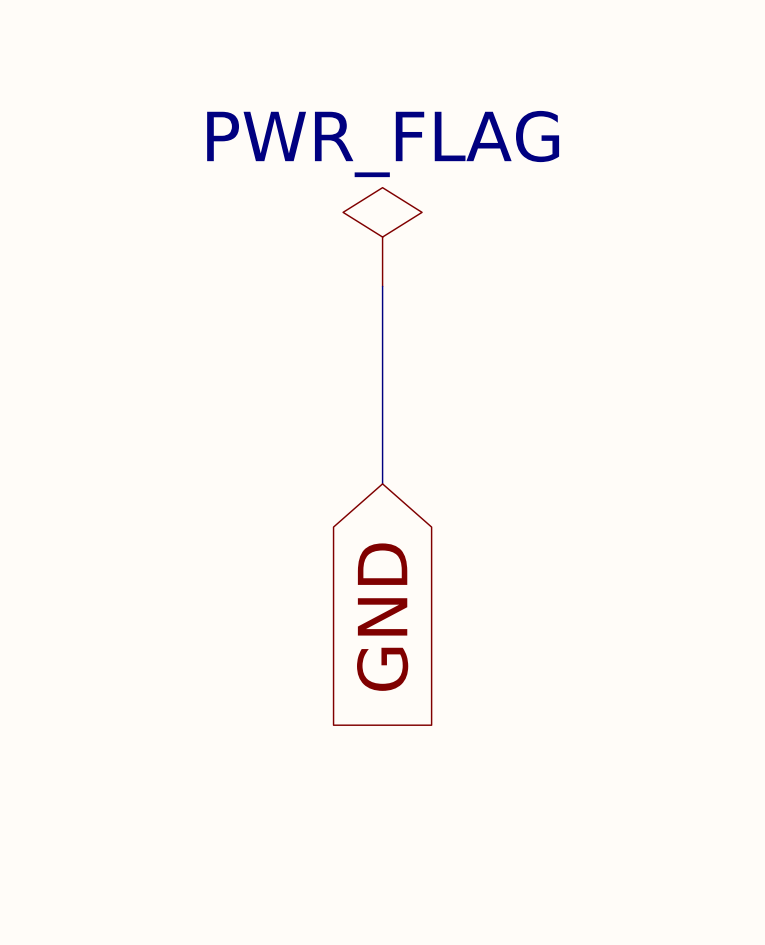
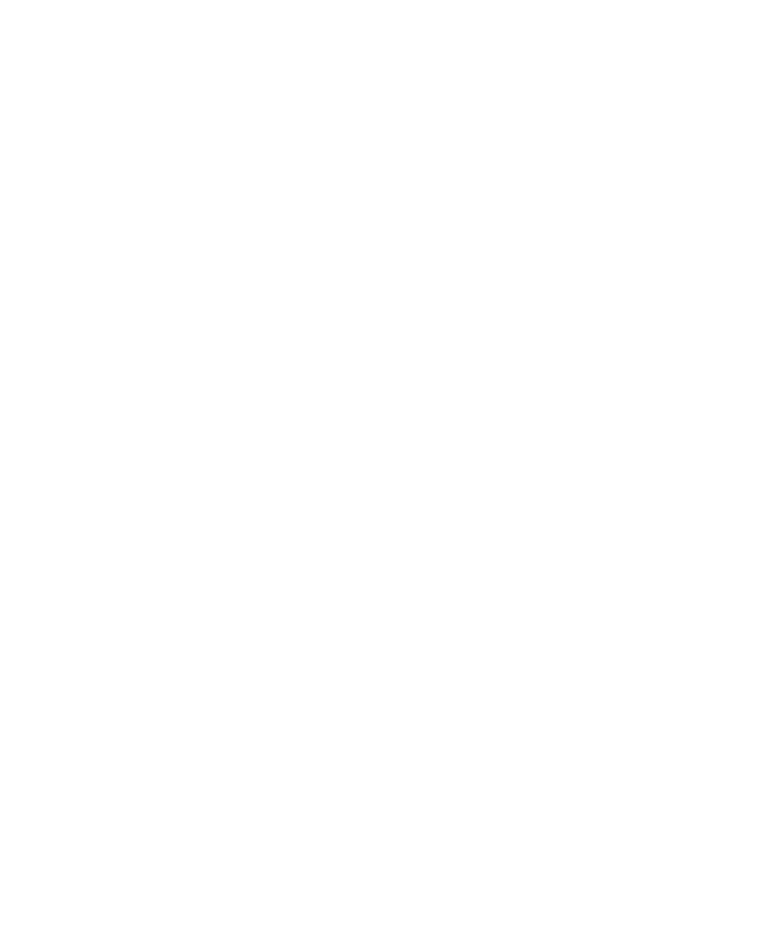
power symbol: PWR_FLAG (382, 237) -> none
wire: (382, 286) (382, 483) -> none
global label: GND (382, 617) -> none

